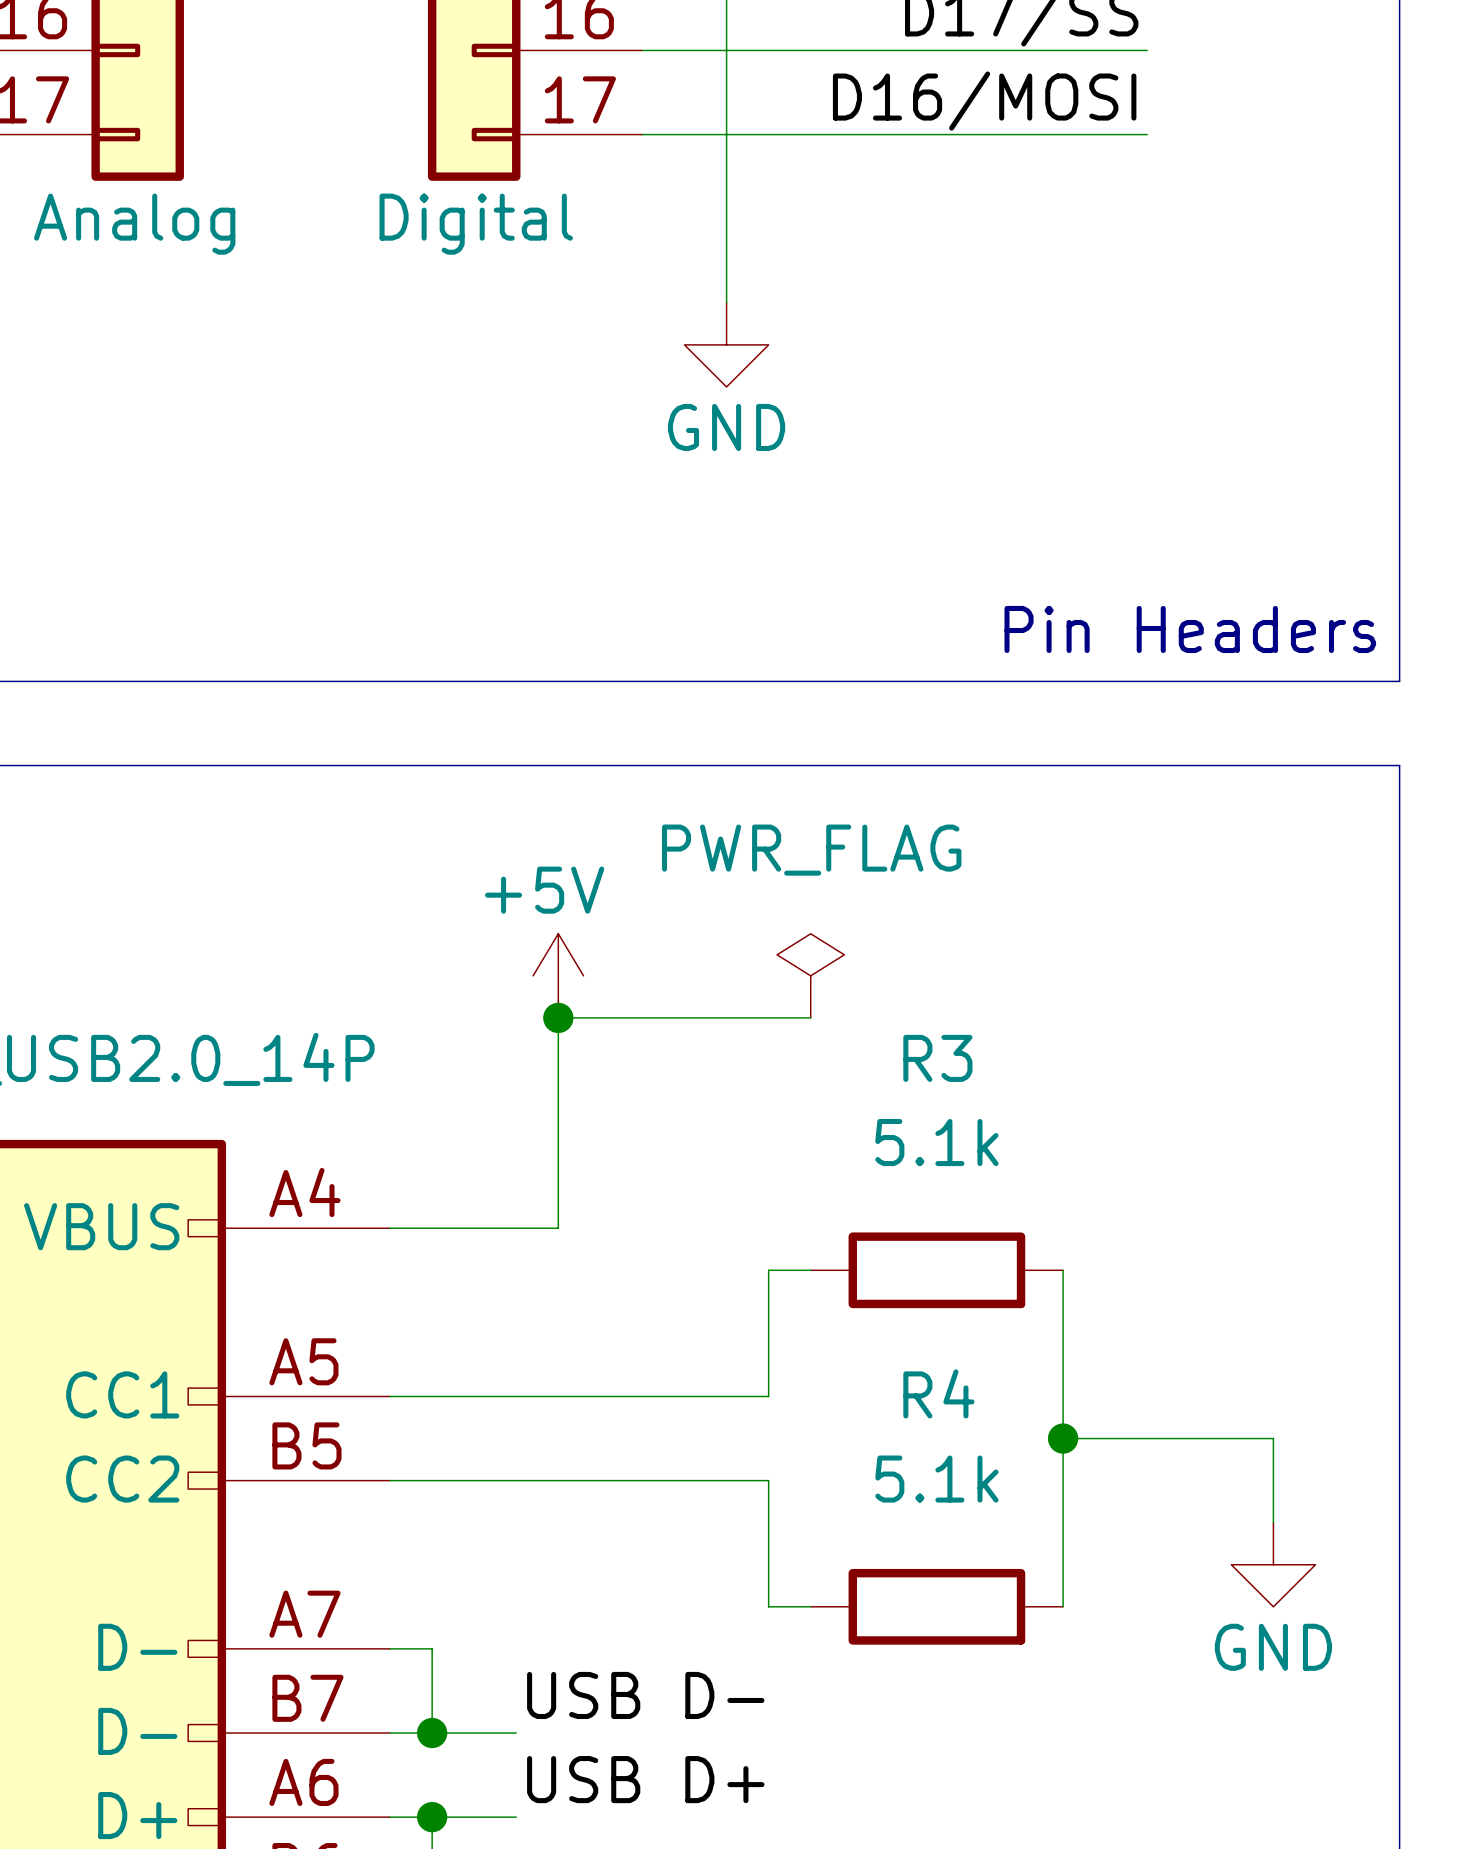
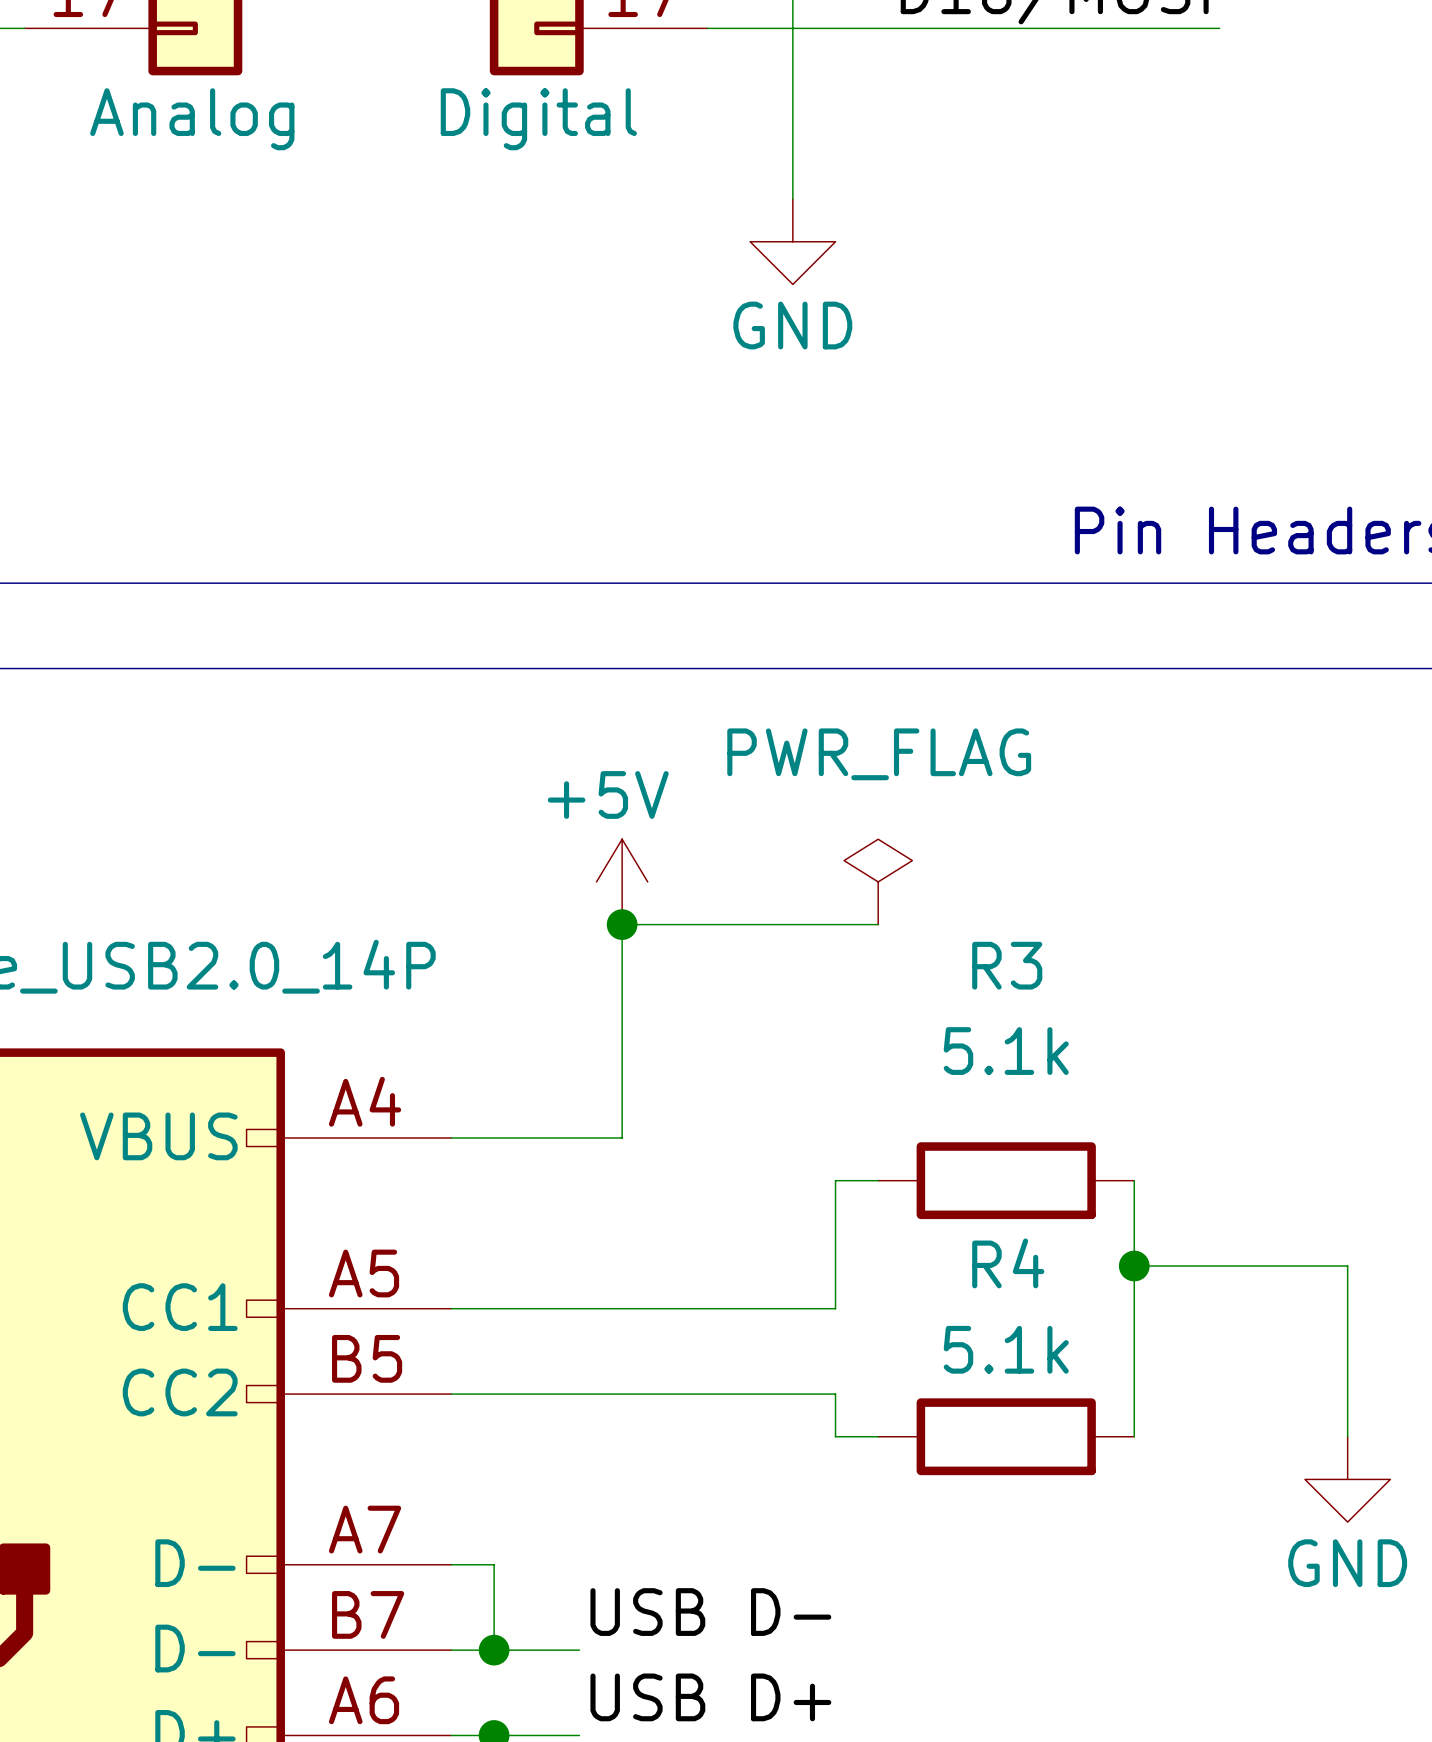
R4 name position: R4 (938, 1393) -> R4 (1008, 1263)
wire: (1063, 1438) (1273, 1438) -> (1134, 1266) (1347, 1266) (1347, 1351)
junction position: (1063, 1438) -> (1134, 1266)
R4 value position: 5.1k (936, 1479) -> 5.1k (1006, 1349)
wire: (768, 1522) (768, 1606) (810, 1606) -> (835, 1436) (878, 1436)
wire: (1063, 1522) (1063, 1606) -> none
R4 position: (936, 1606) -> (1006, 1436)

